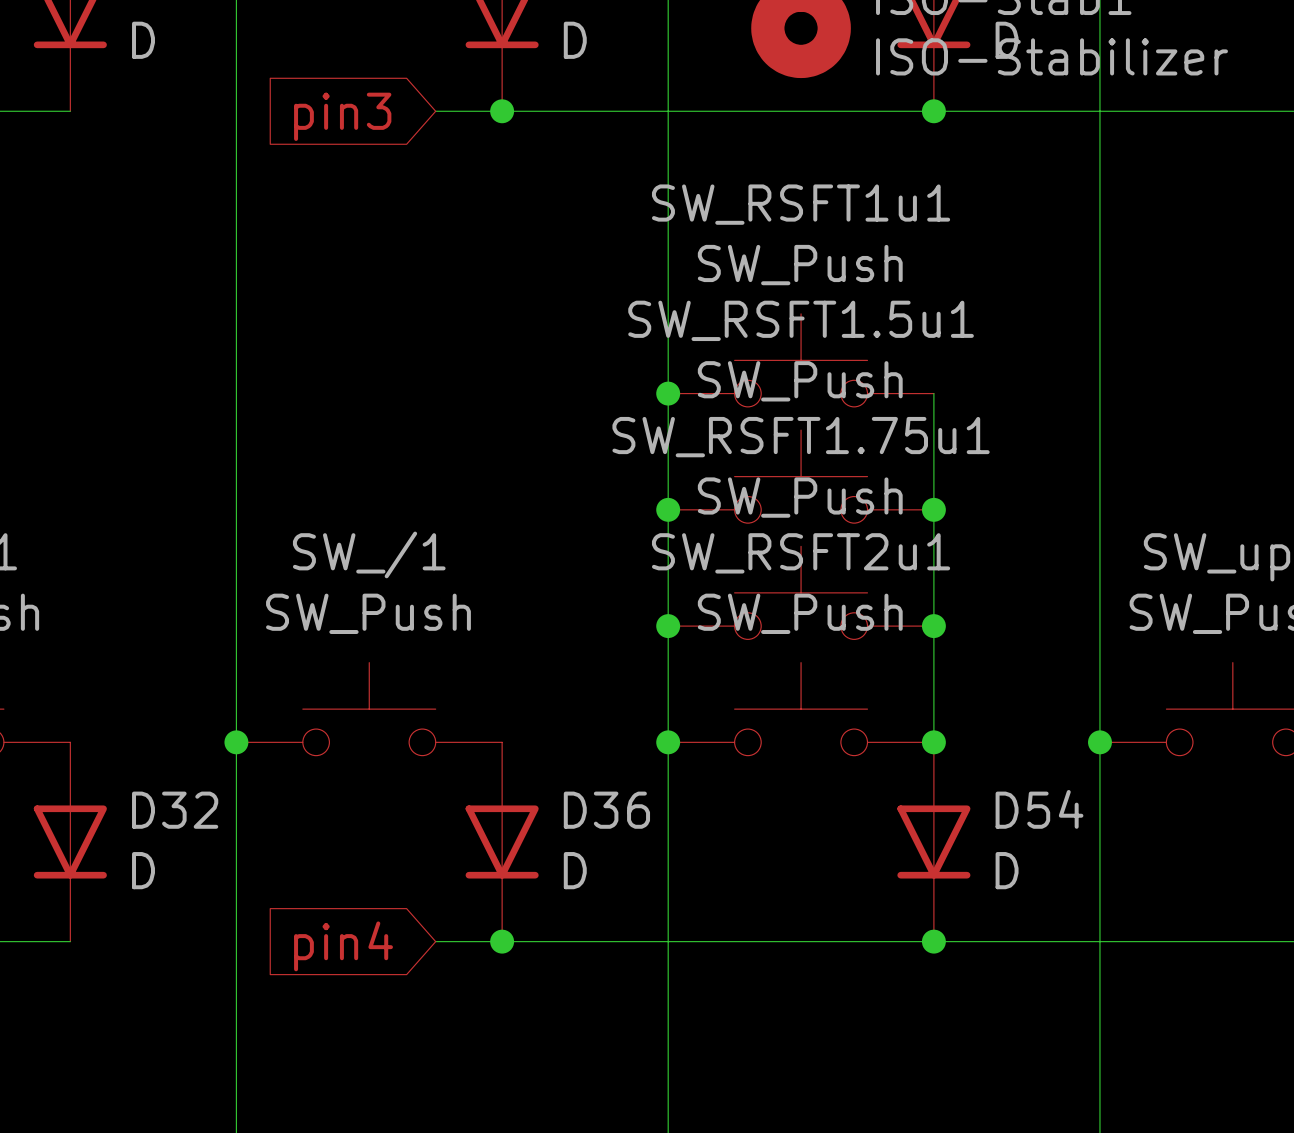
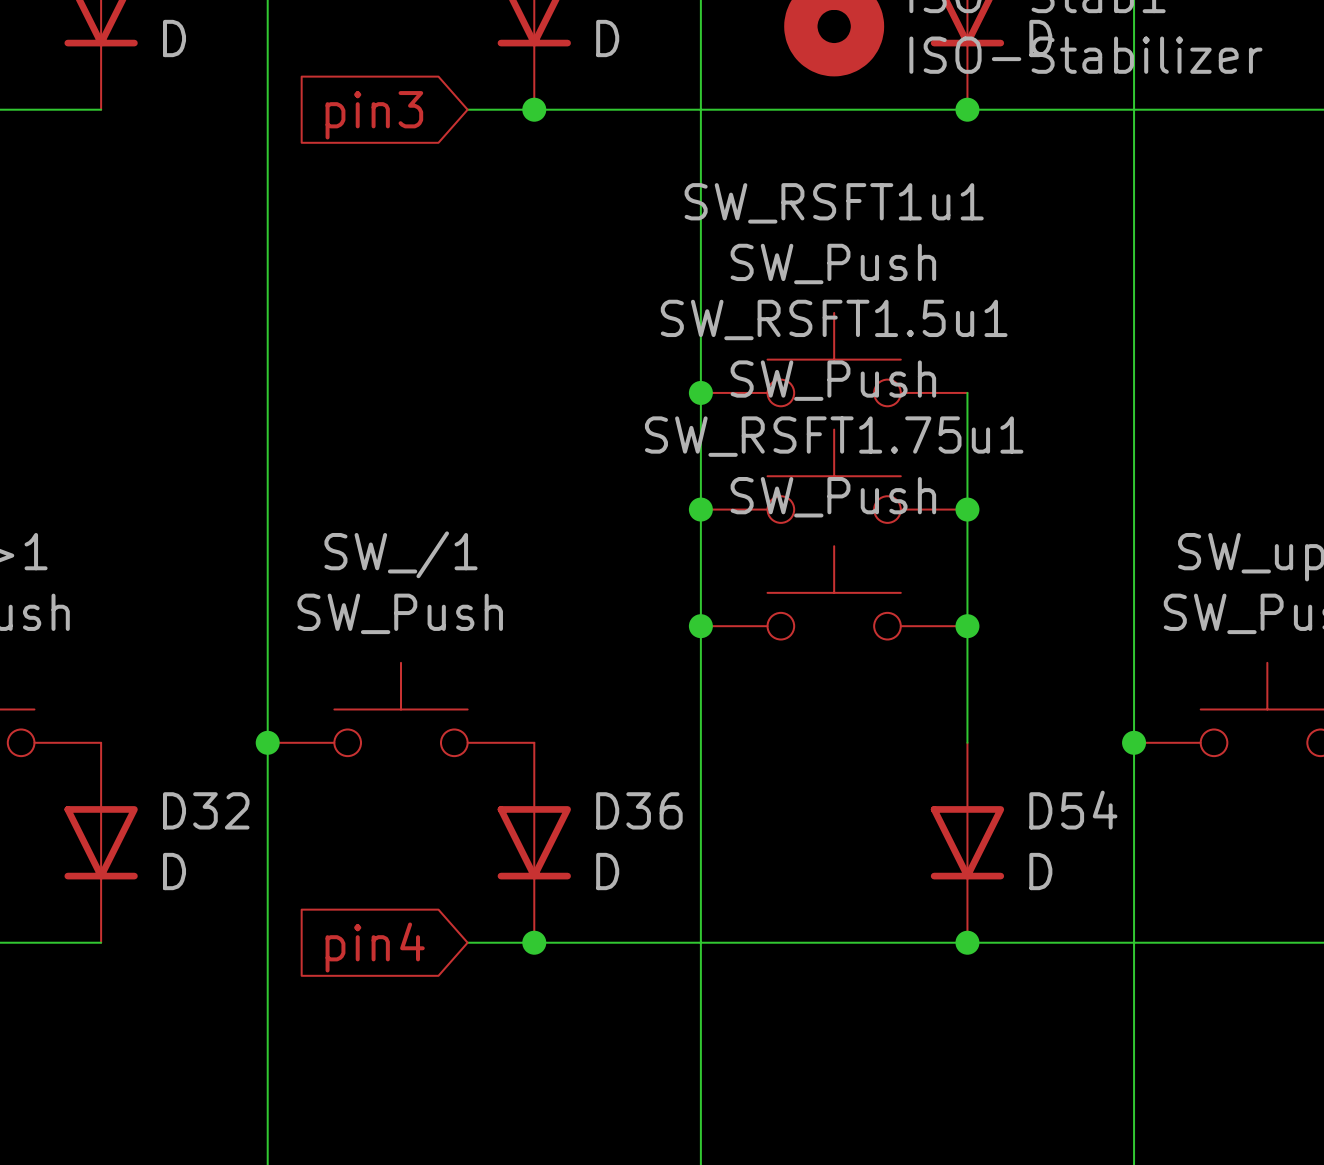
SW_RSFT2u1: SW_Push (801, 709) -> none
junction: (668, 742) -> none
junction: (933, 742) -> none

